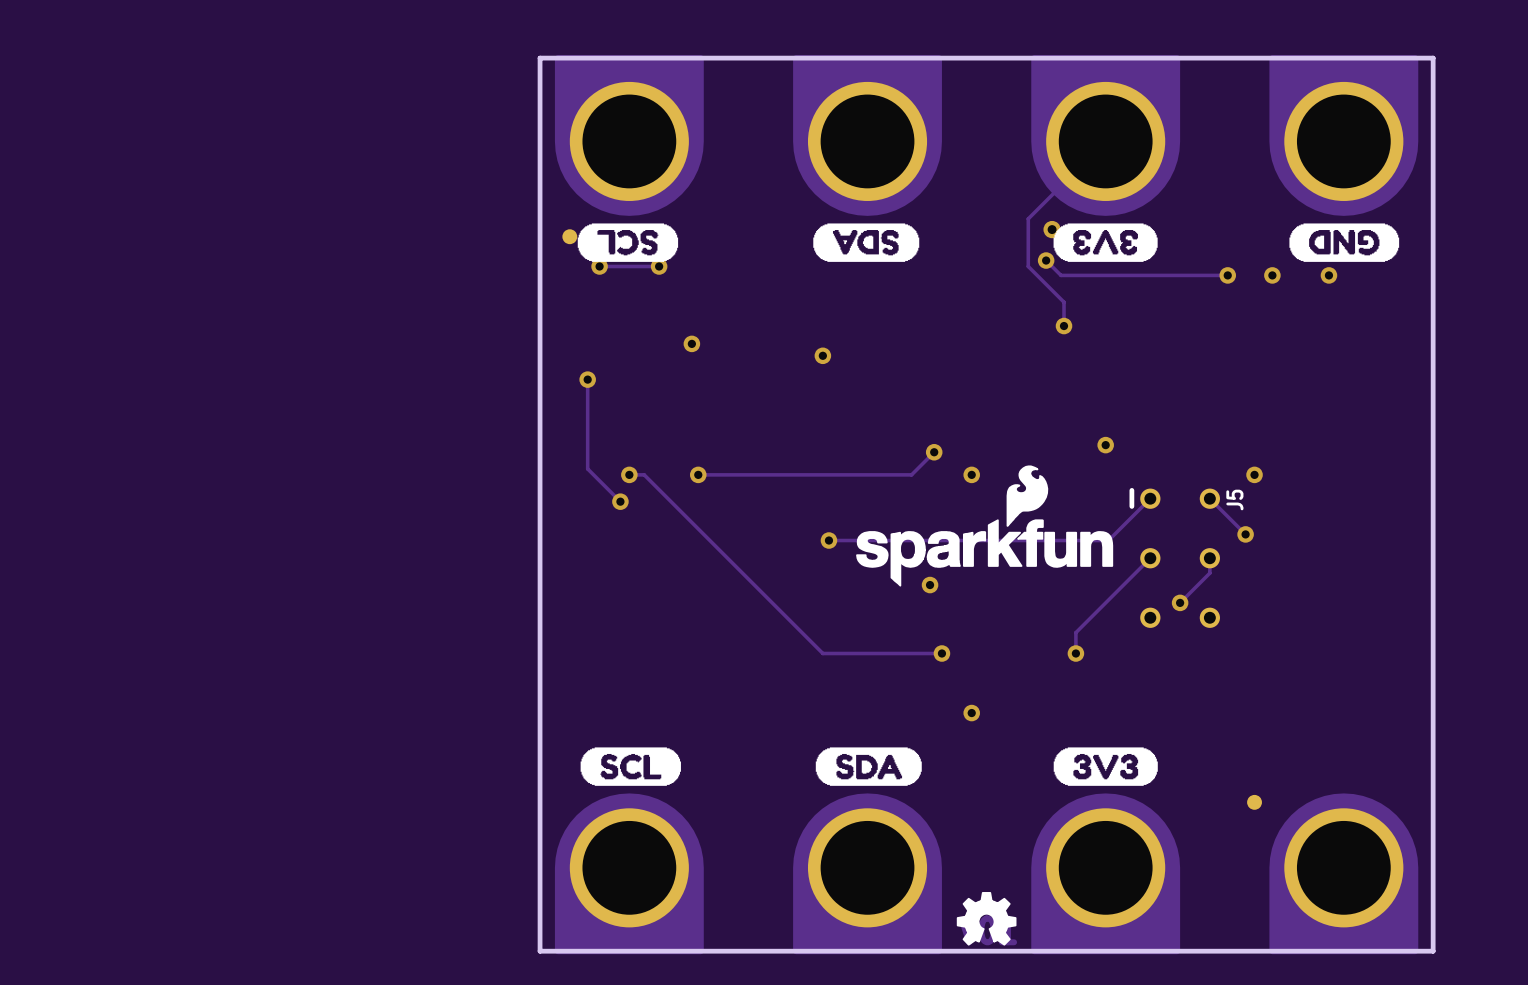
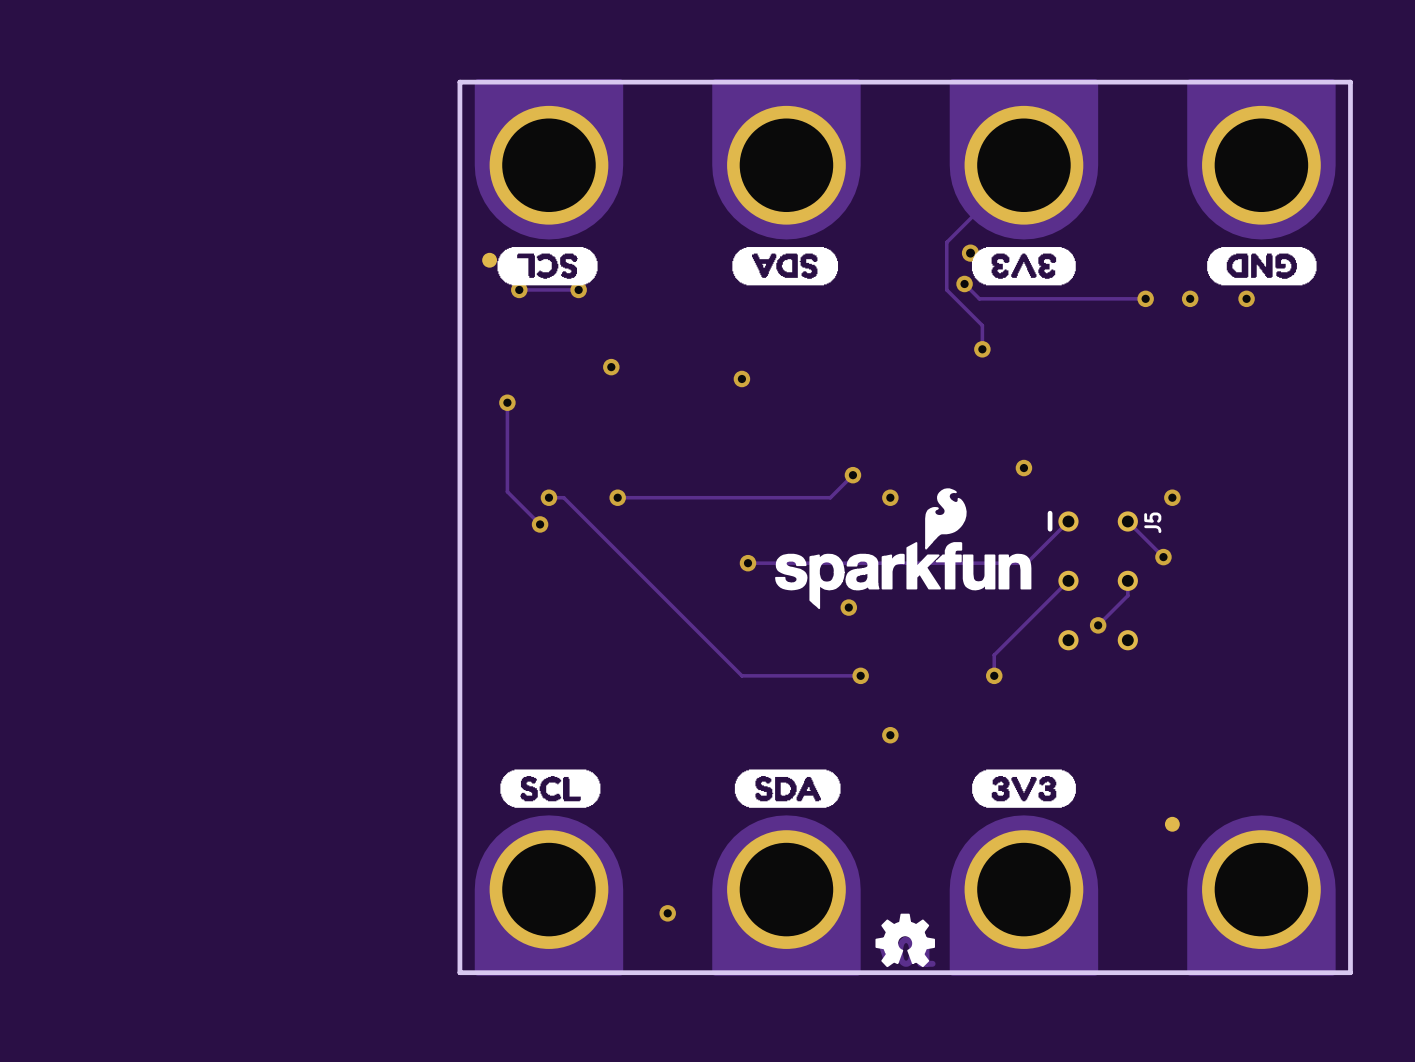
via: none -> (667, 913)

